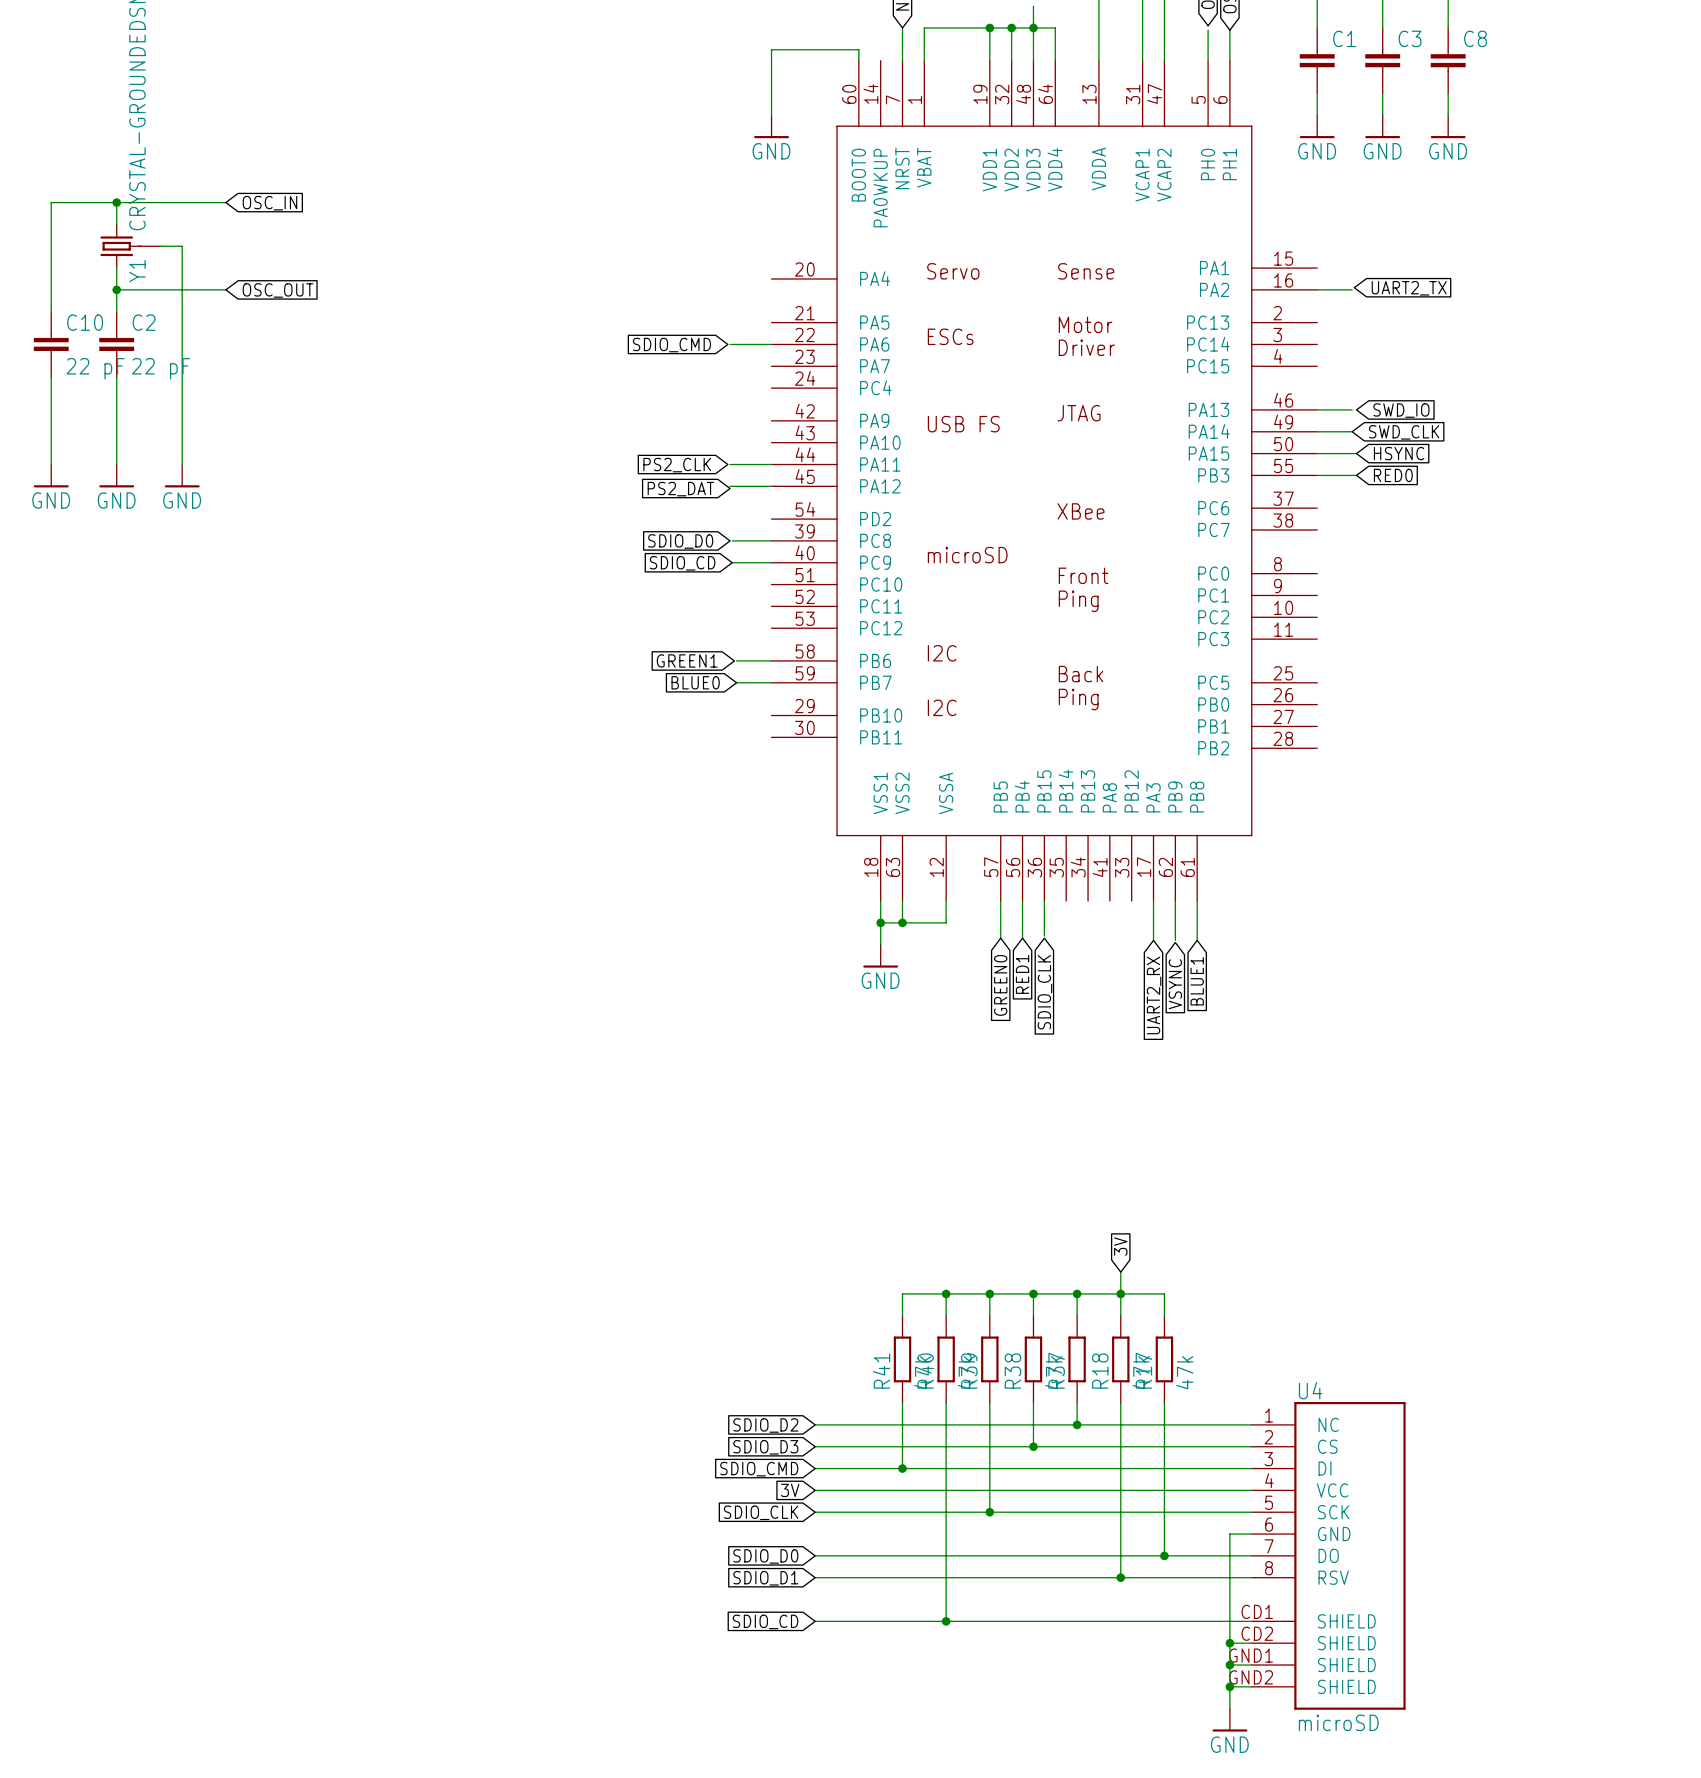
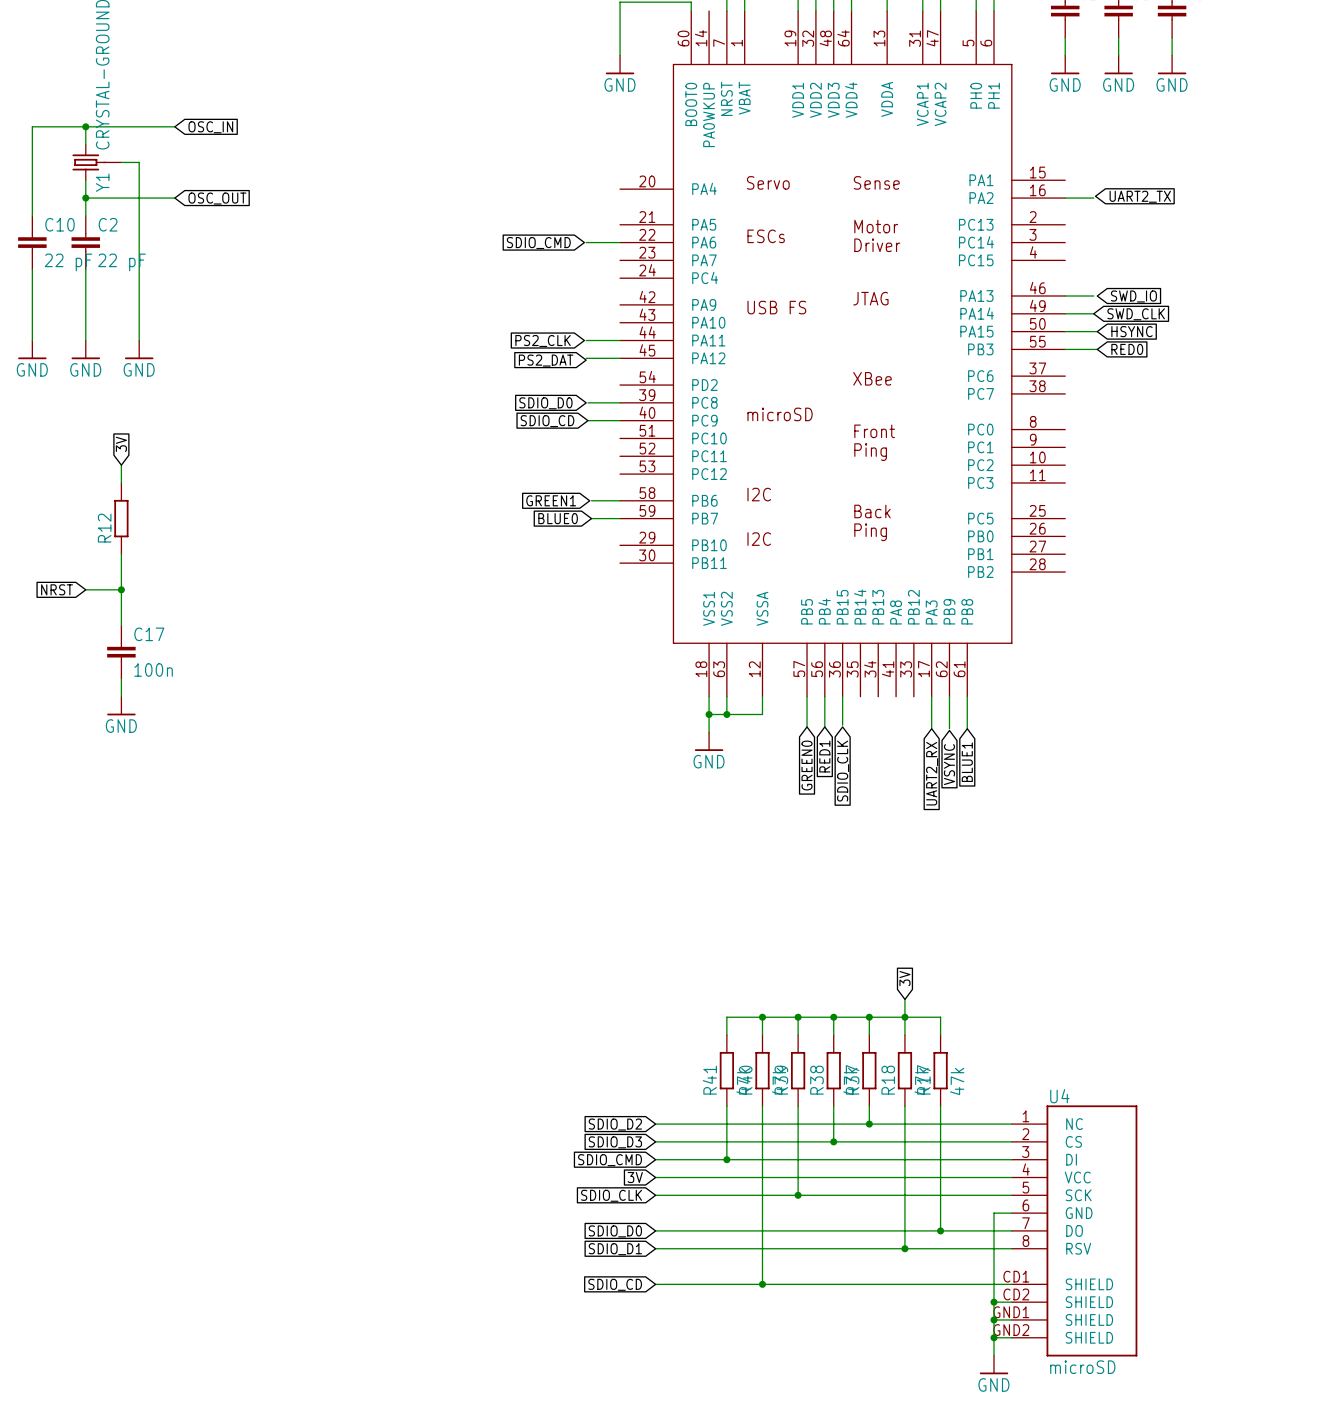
global label: none -> 3V (121, 444)
wire: none -> (121, 465) (121, 482)
R12: none -> (121, 518)
wire: none -> (121, 554) (121, 625)
global label: none -> NRST (57, 589)
wire: none -> (85, 589) (121, 589)
junction: none -> (121, 589)
C17: none -> 100n (121, 652)
wire: none -> (121, 678) (121, 696)
power symbol: none -> GND (121, 706)

